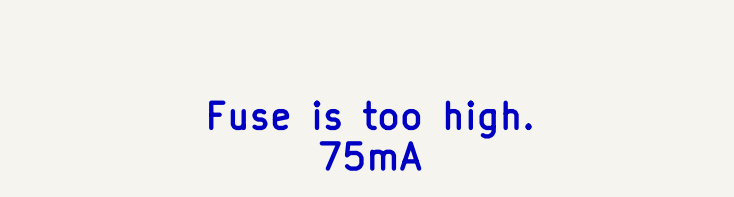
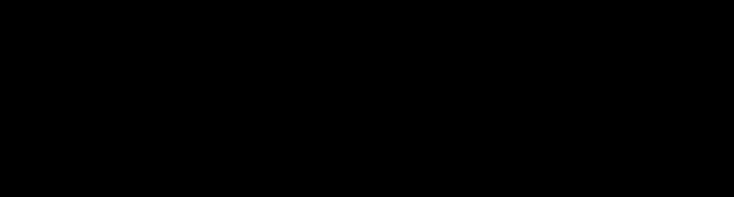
text: Fuse is too high. (370, 119) -> none
text: 75mA (370, 155) -> none

